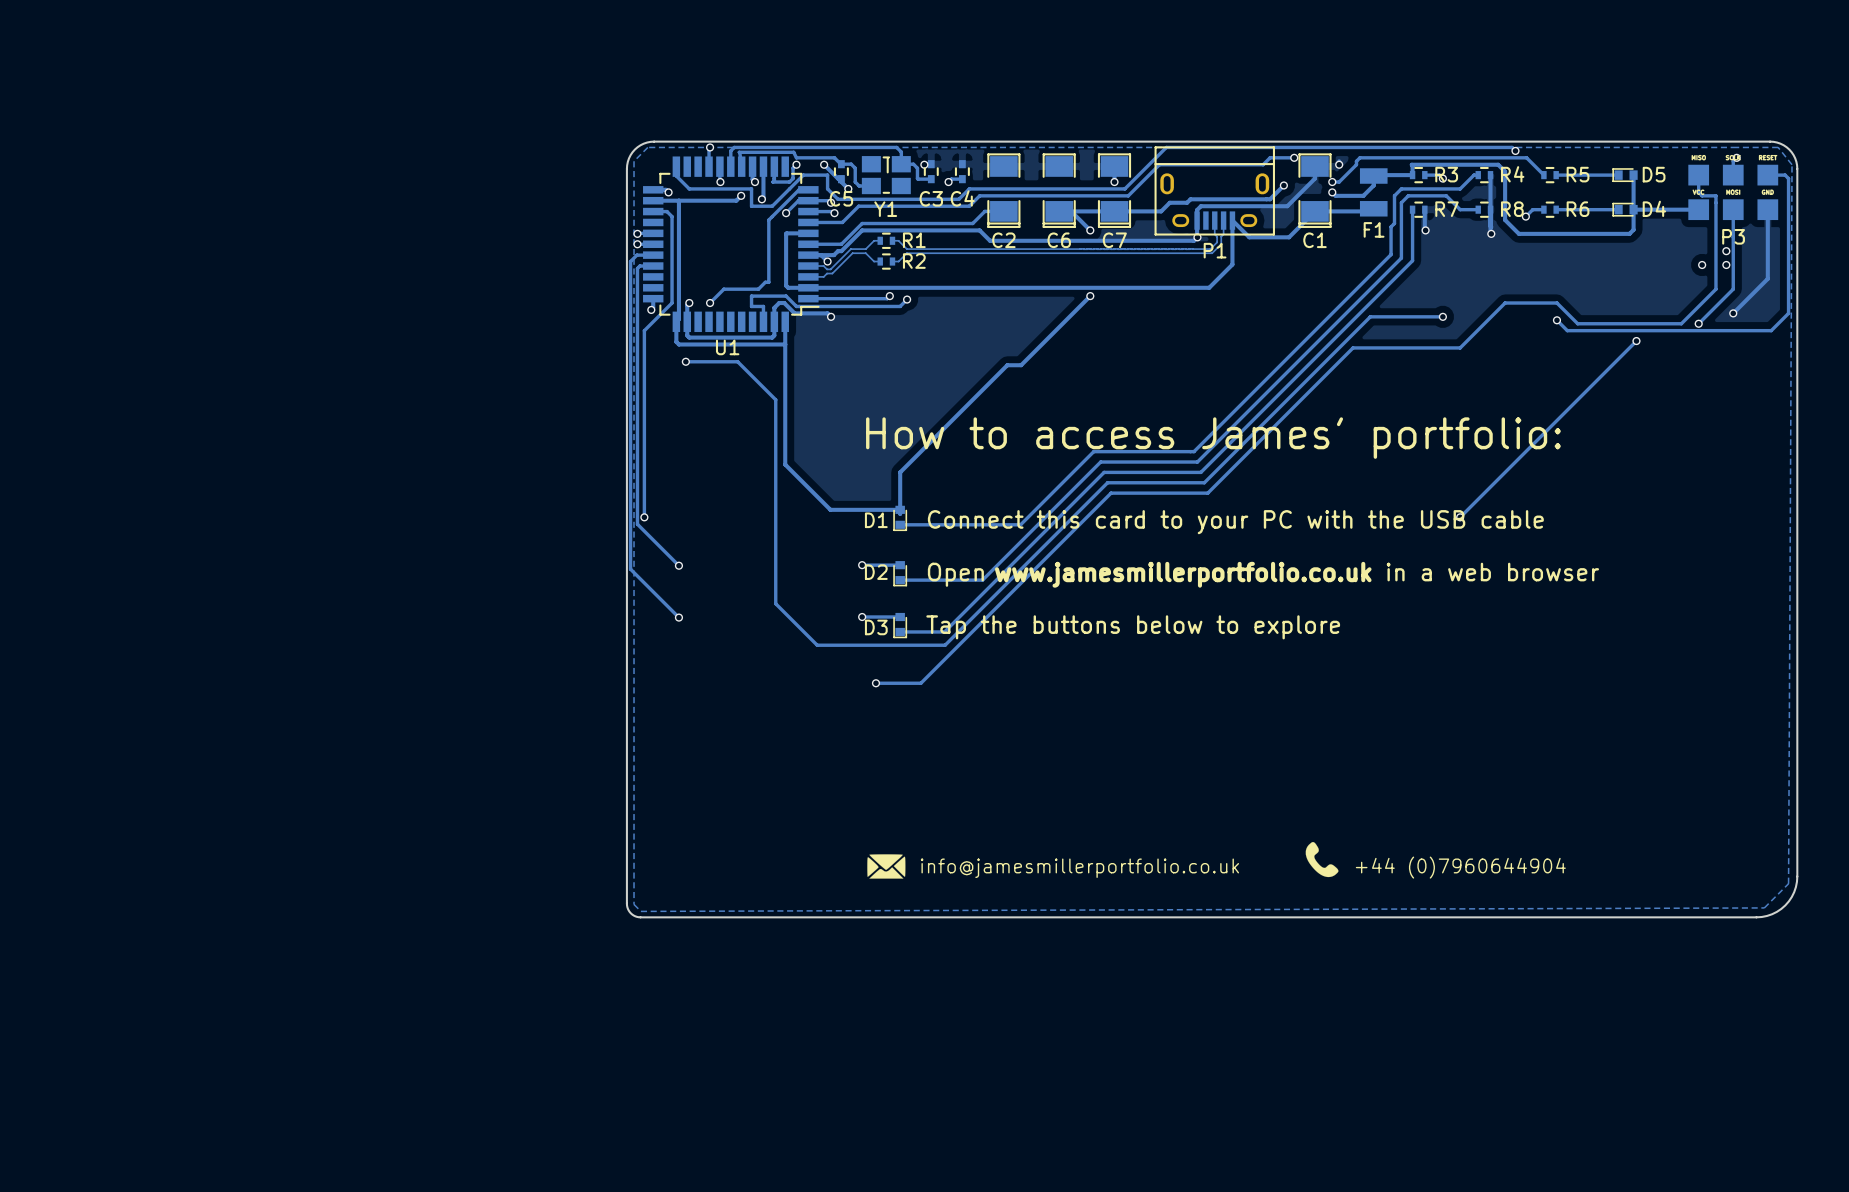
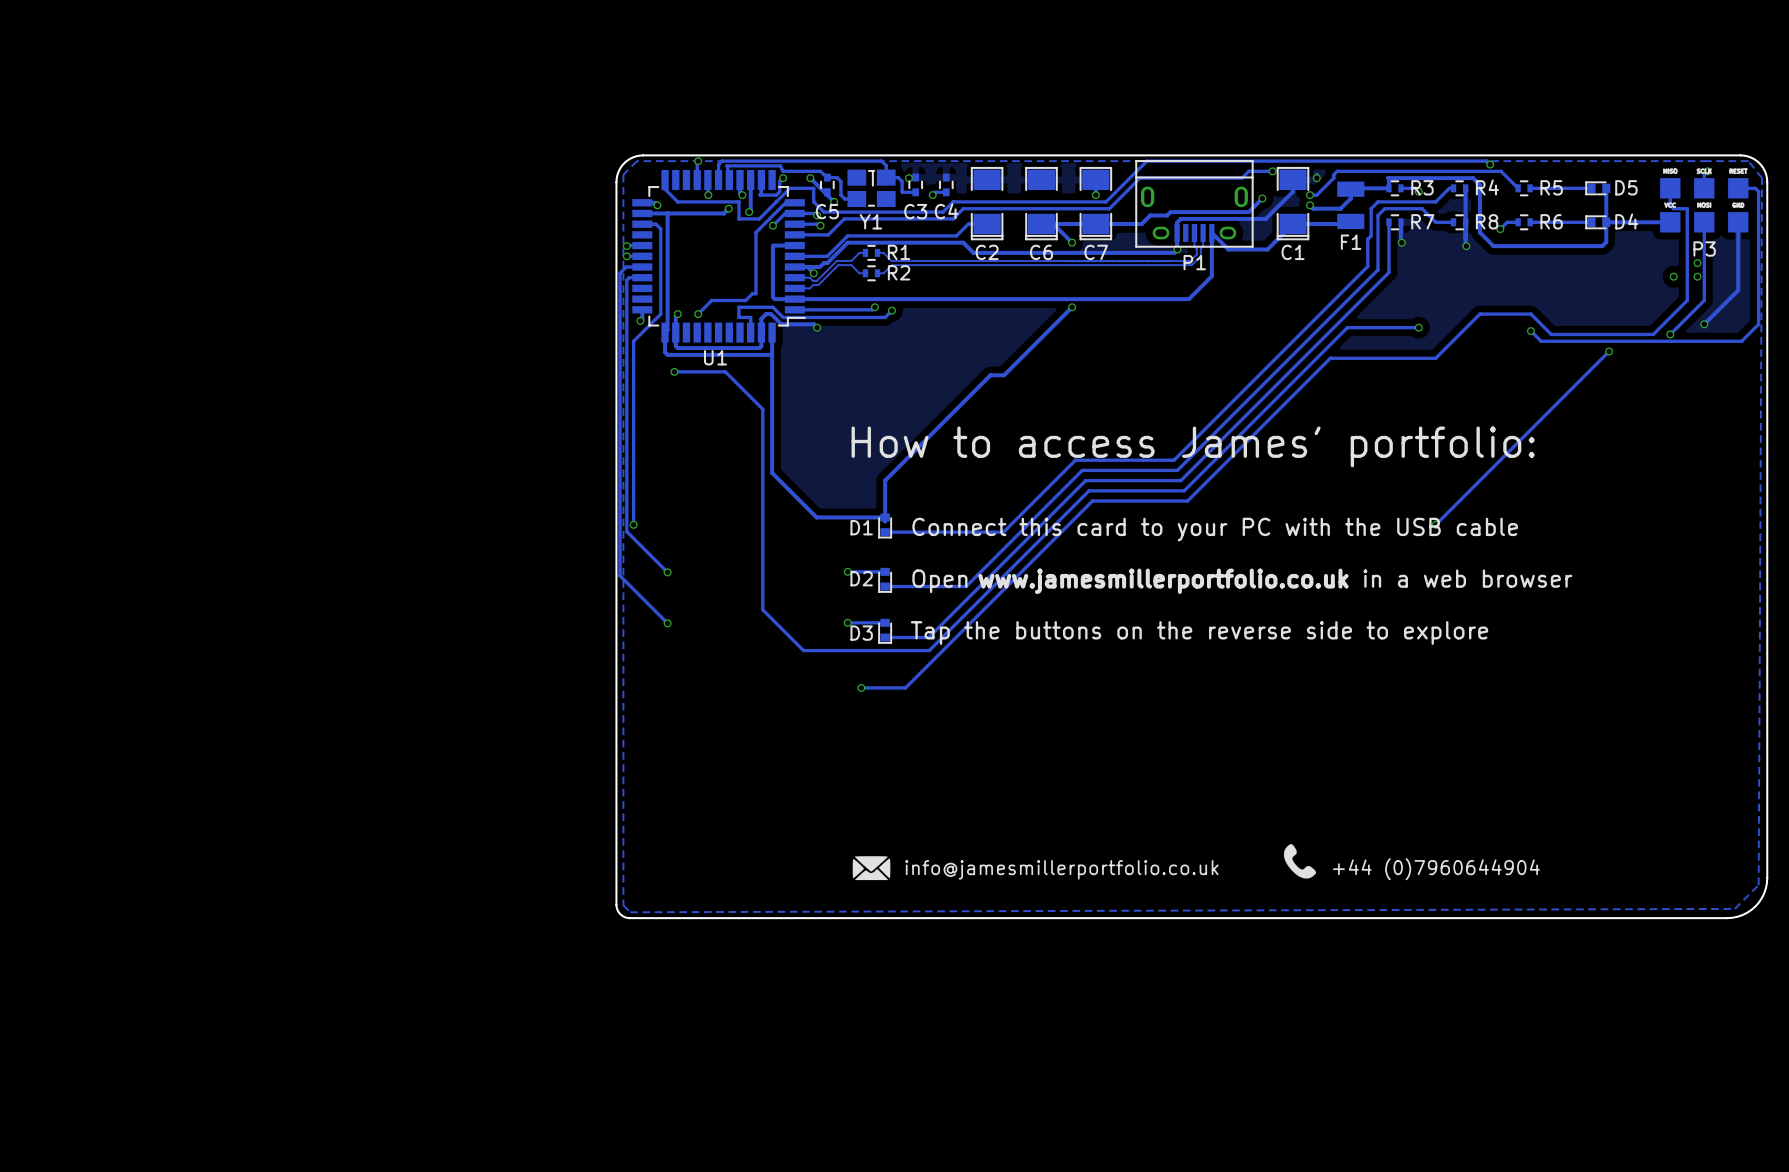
text: Tap the buttons below to explore (1133, 627) -> Tap the buttons on the reverse side to explore (1199, 632)

